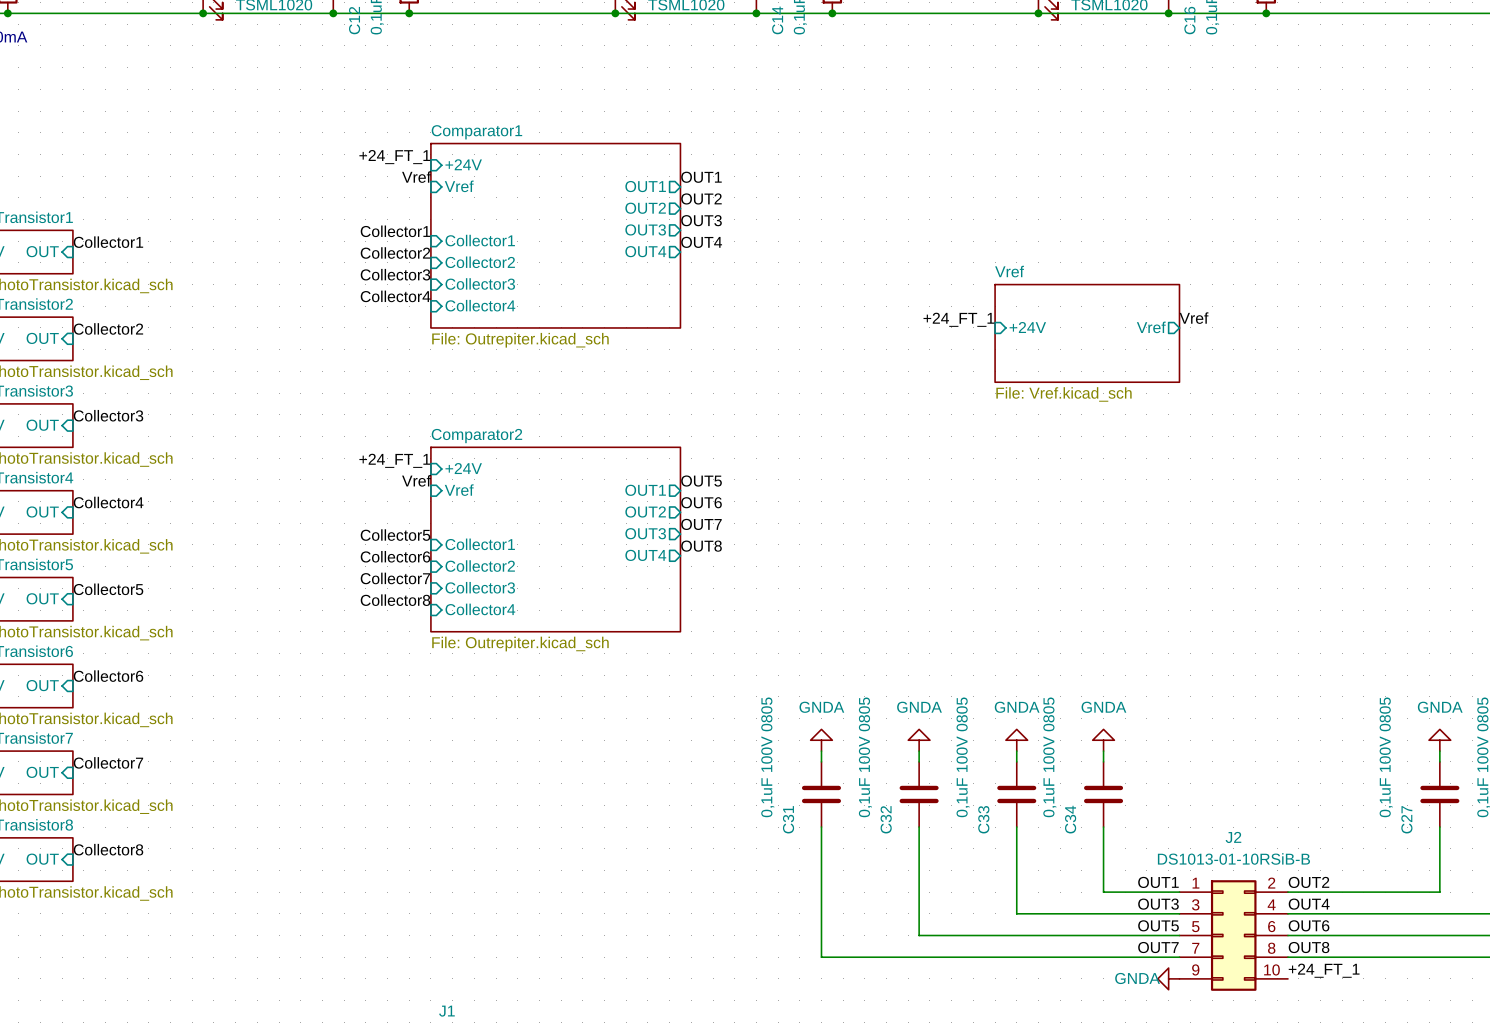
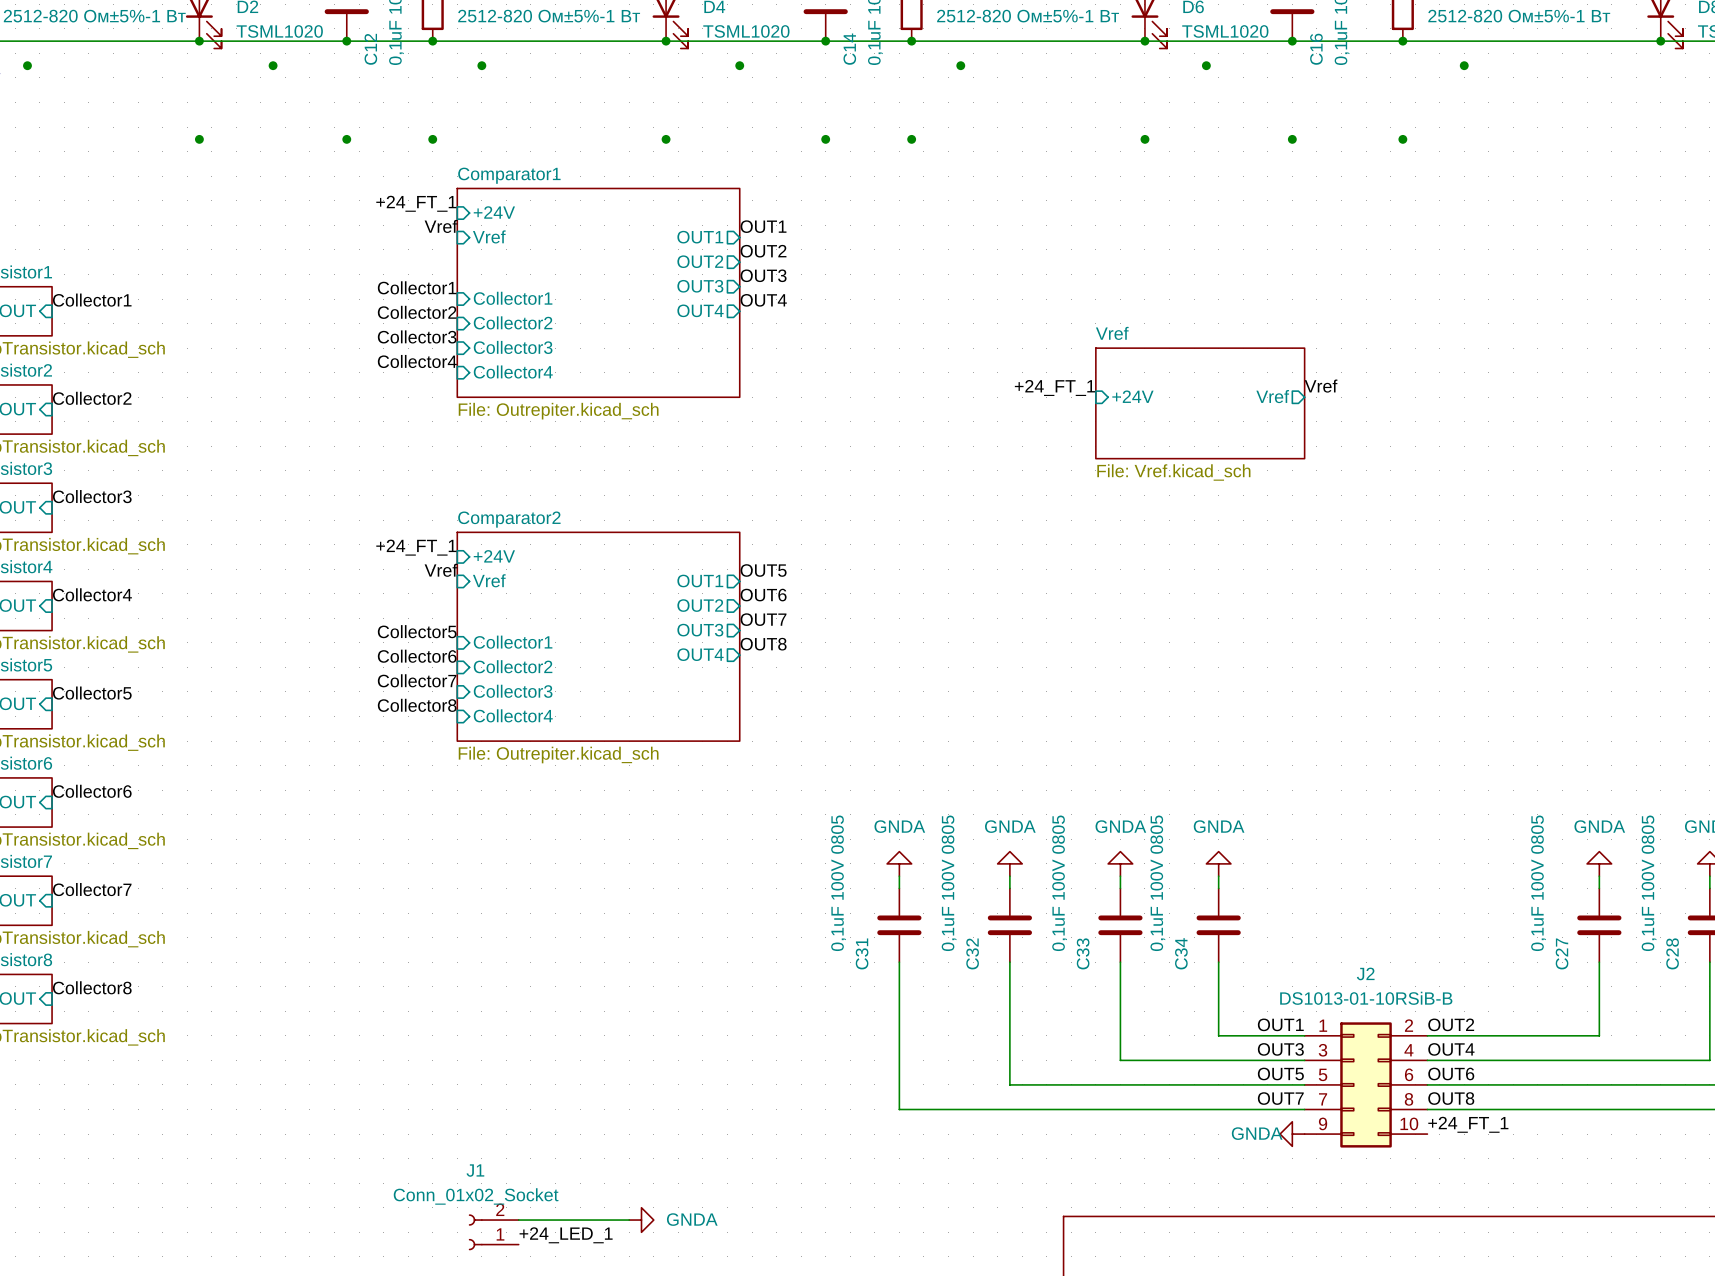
junction: none -> (27, 65)
junction: none -> (273, 65)
junction: none -> (481, 65)
junction: none -> (739, 65)
junction: none -> (960, 65)
junction: none -> (1206, 65)
junction: none -> (1464, 65)
junction: none -> (199, 139)
junction: none -> (346, 139)
junction: none -> (432, 139)
junction: none -> (666, 139)
junction: none -> (825, 139)
junction: none -> (911, 139)
junction: none -> (1144, 139)
junction: none -> (1292, 139)
junction: none -> (1402, 139)

